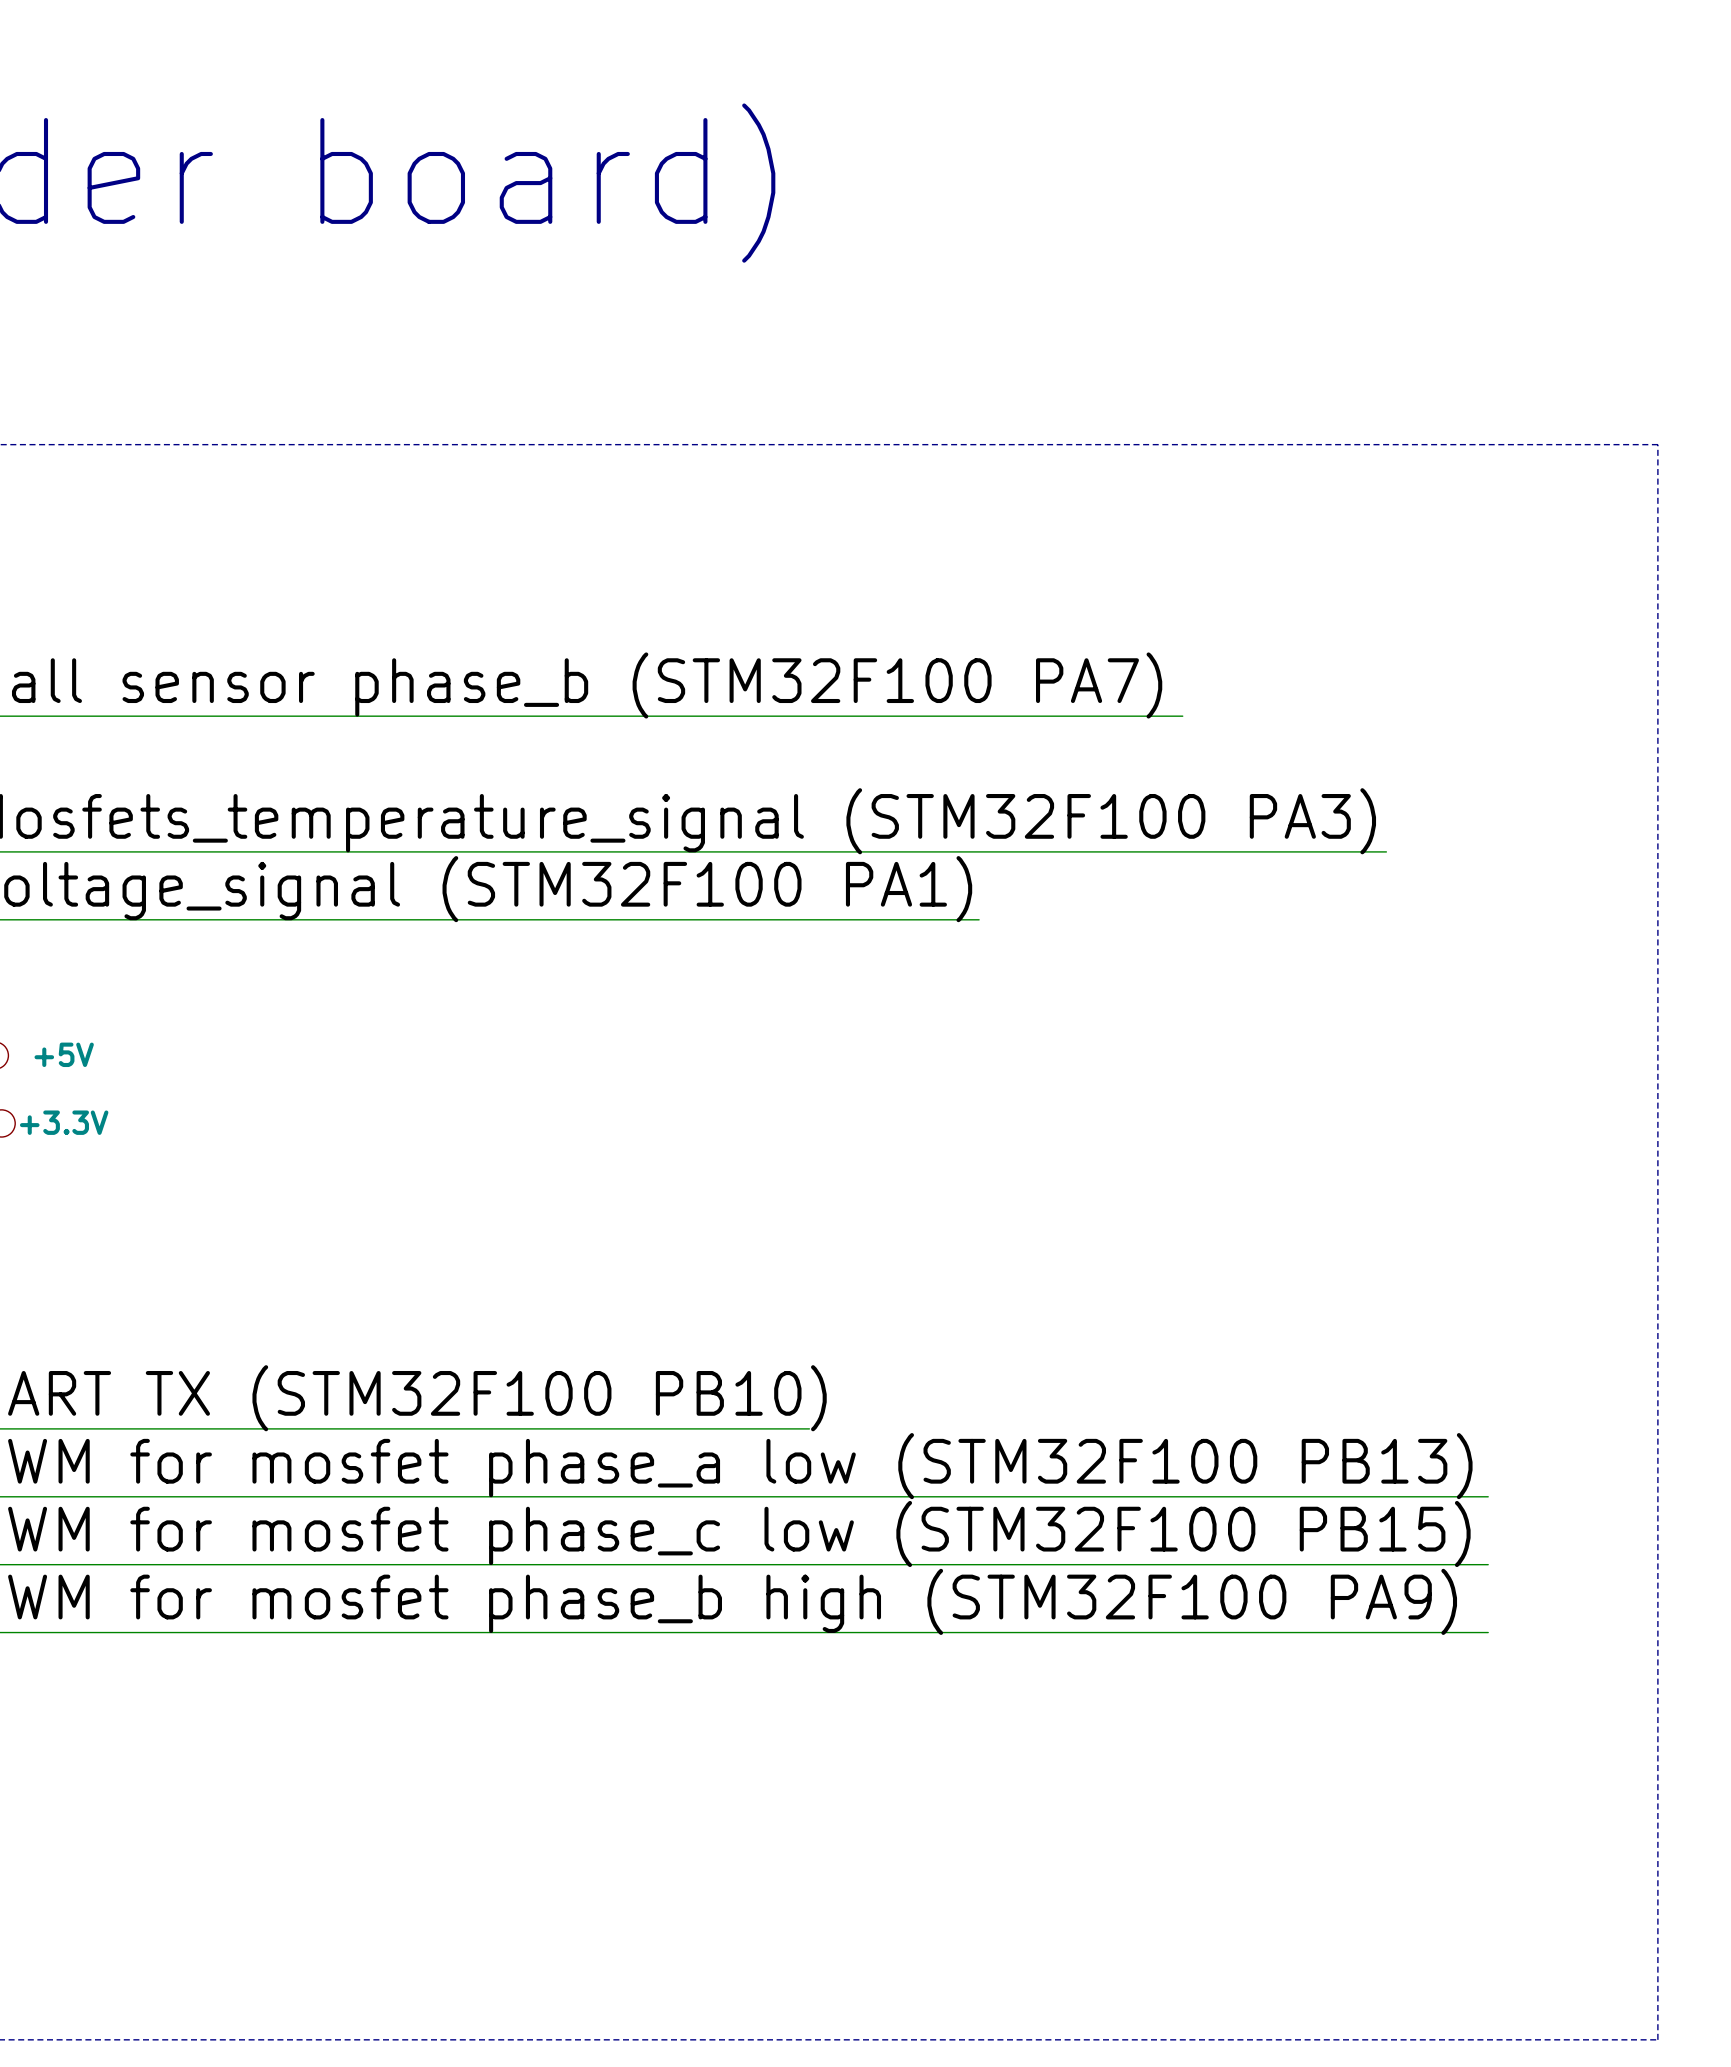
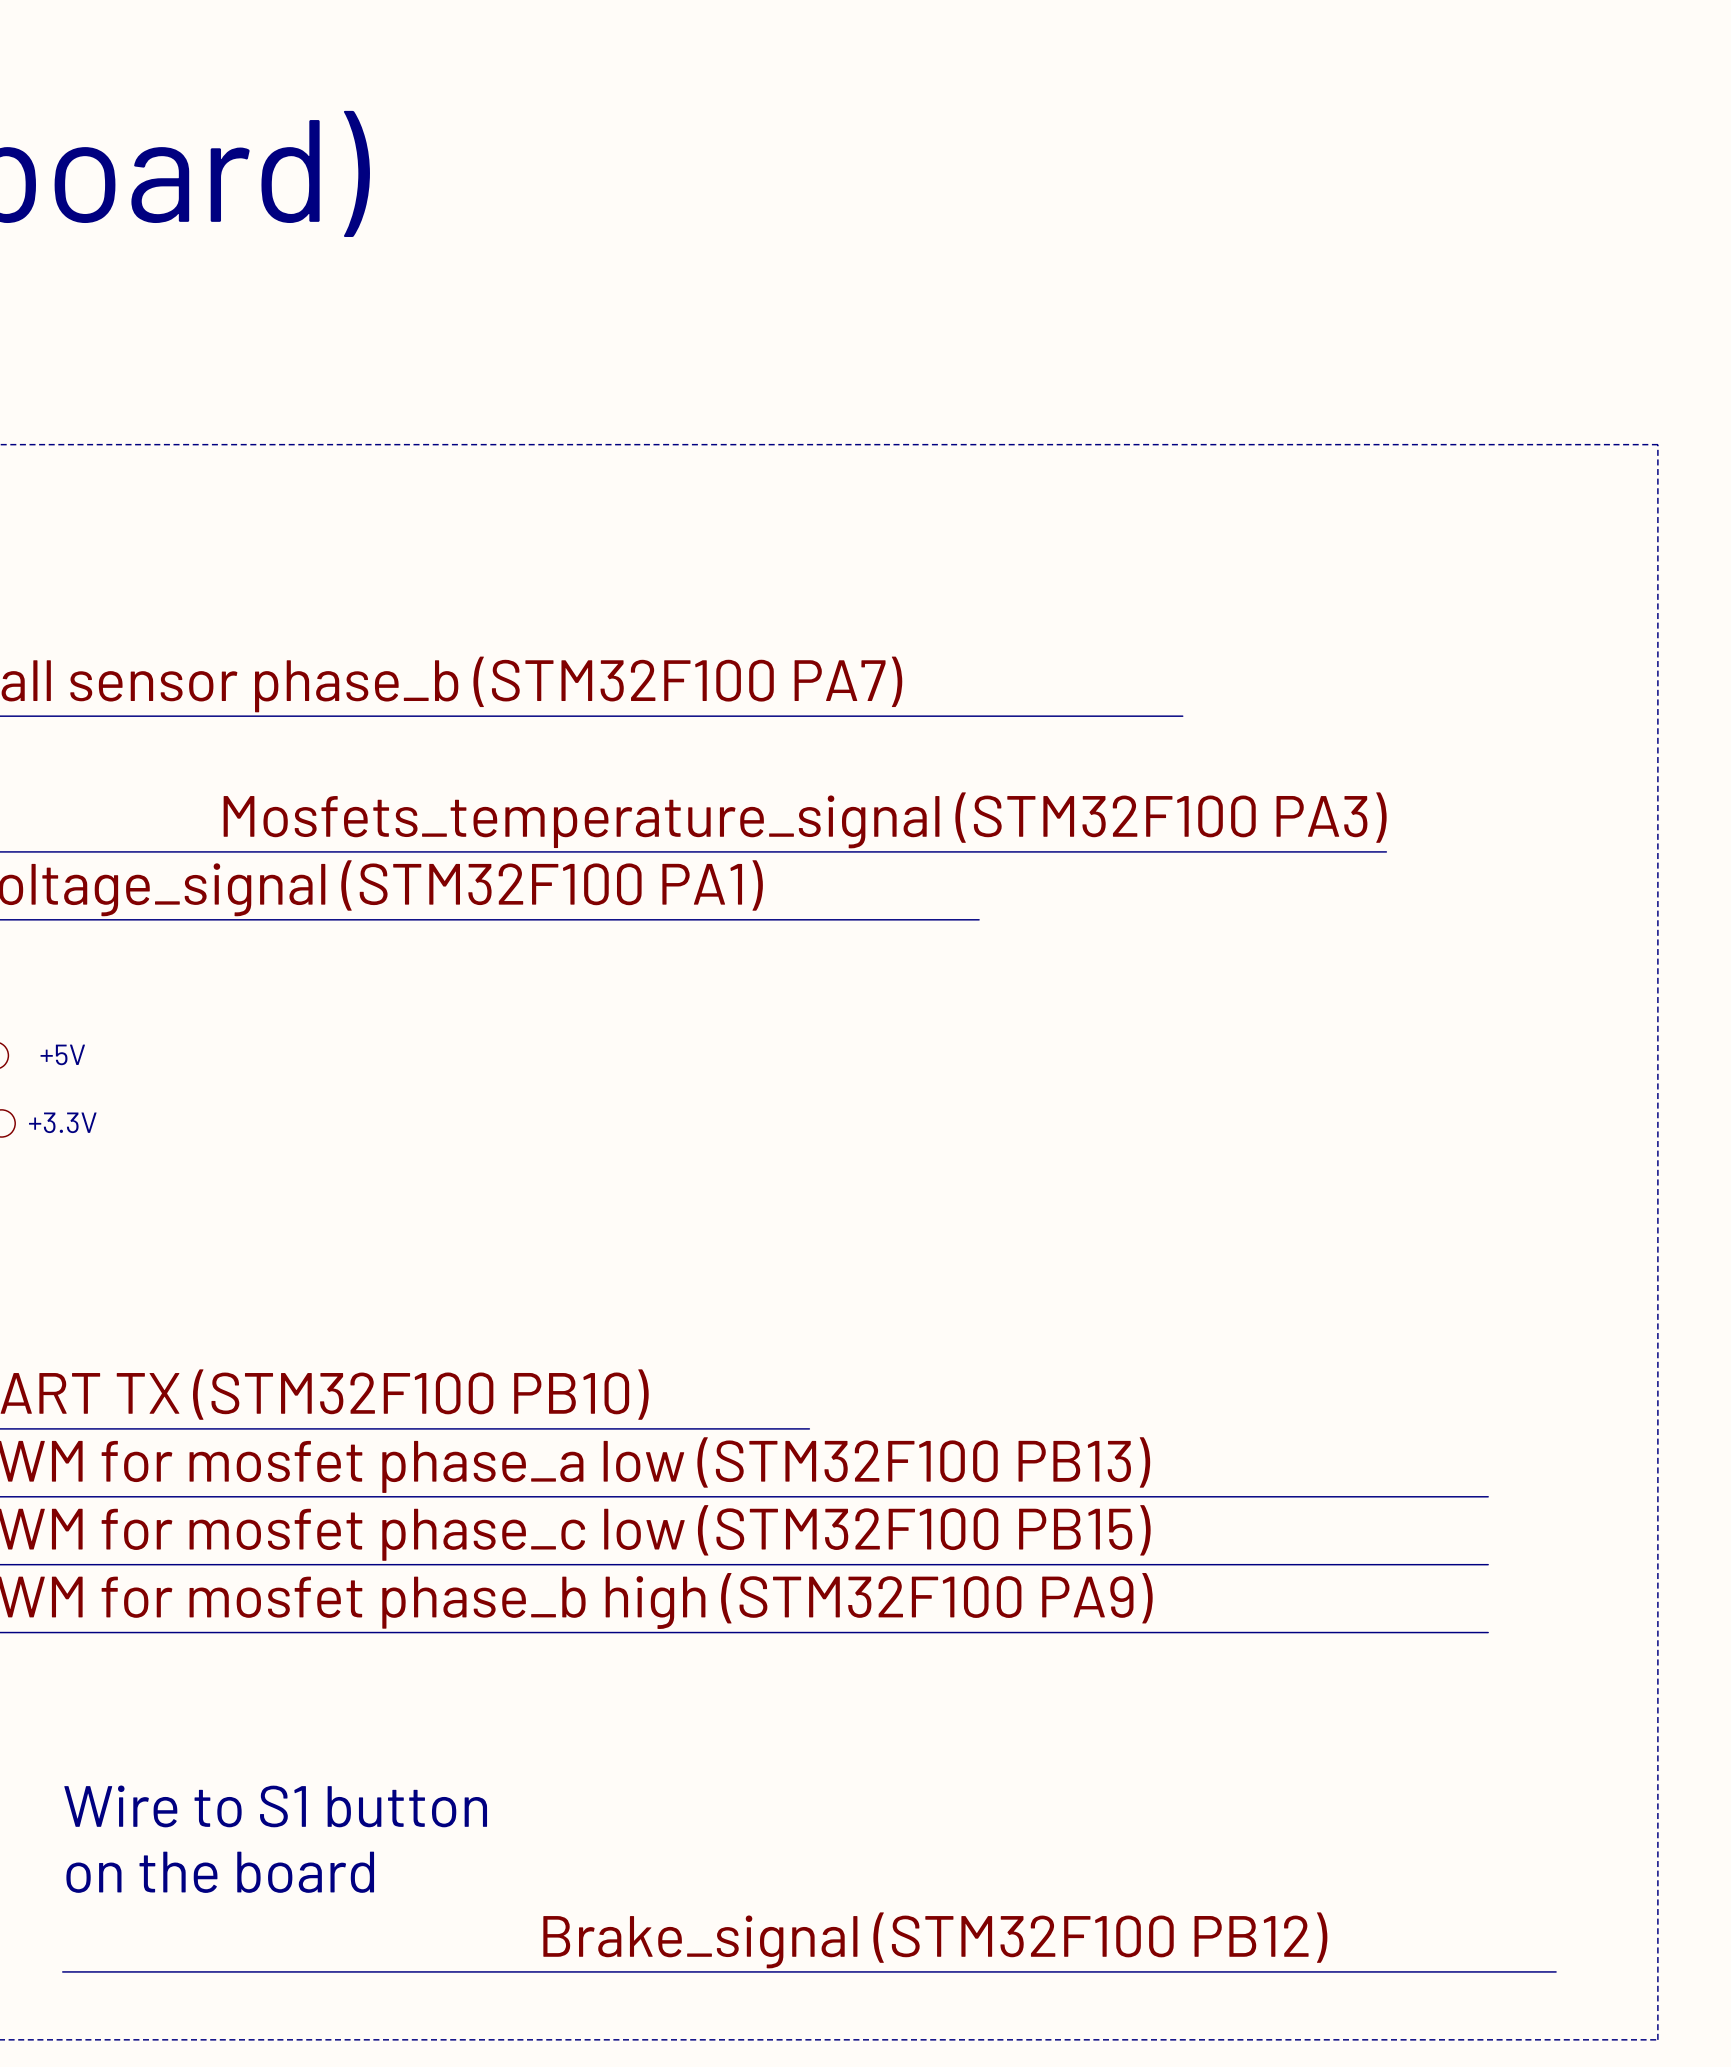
text: none -> Wire to S1 button (275, 1806)
text: none -> on the board (220, 1872)
label: none -> Brake_signal (STM32F100 PB12) (935, 1940)
wire: none -> (62, 1971) (1556, 1971)

